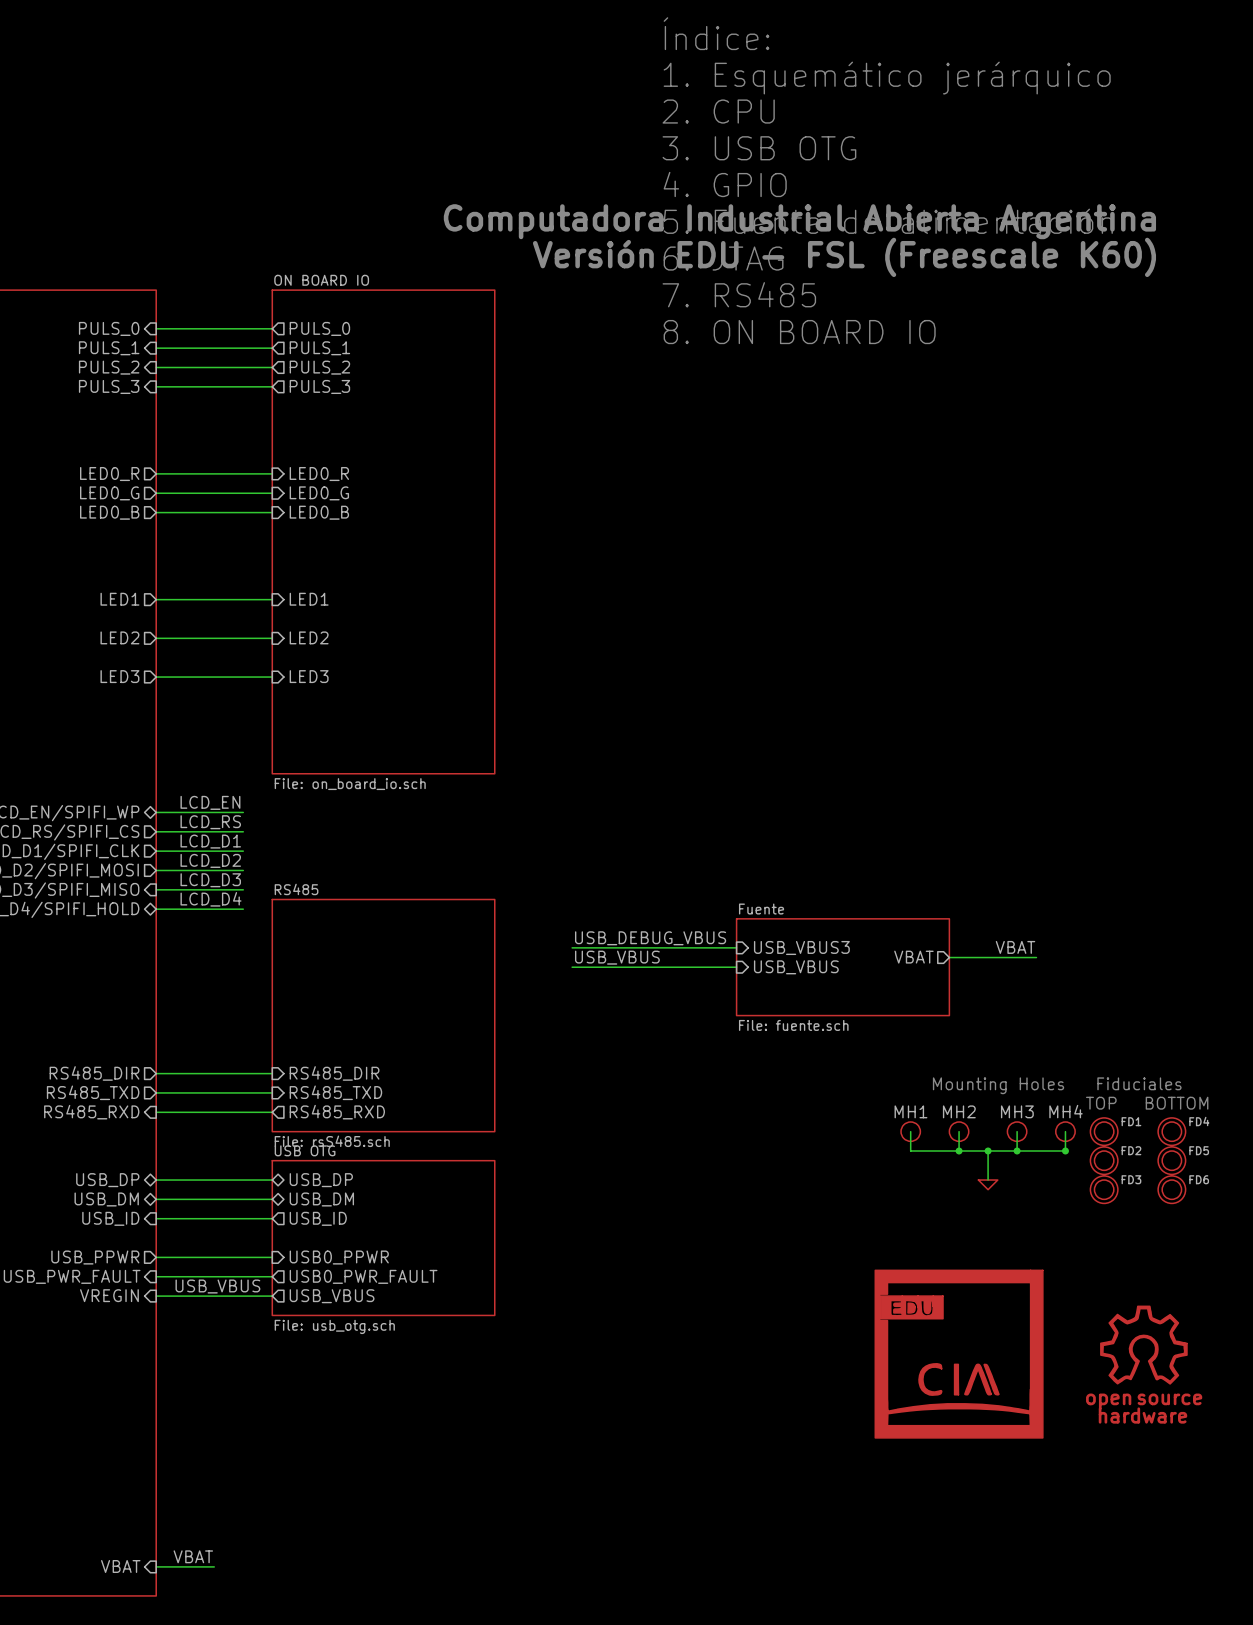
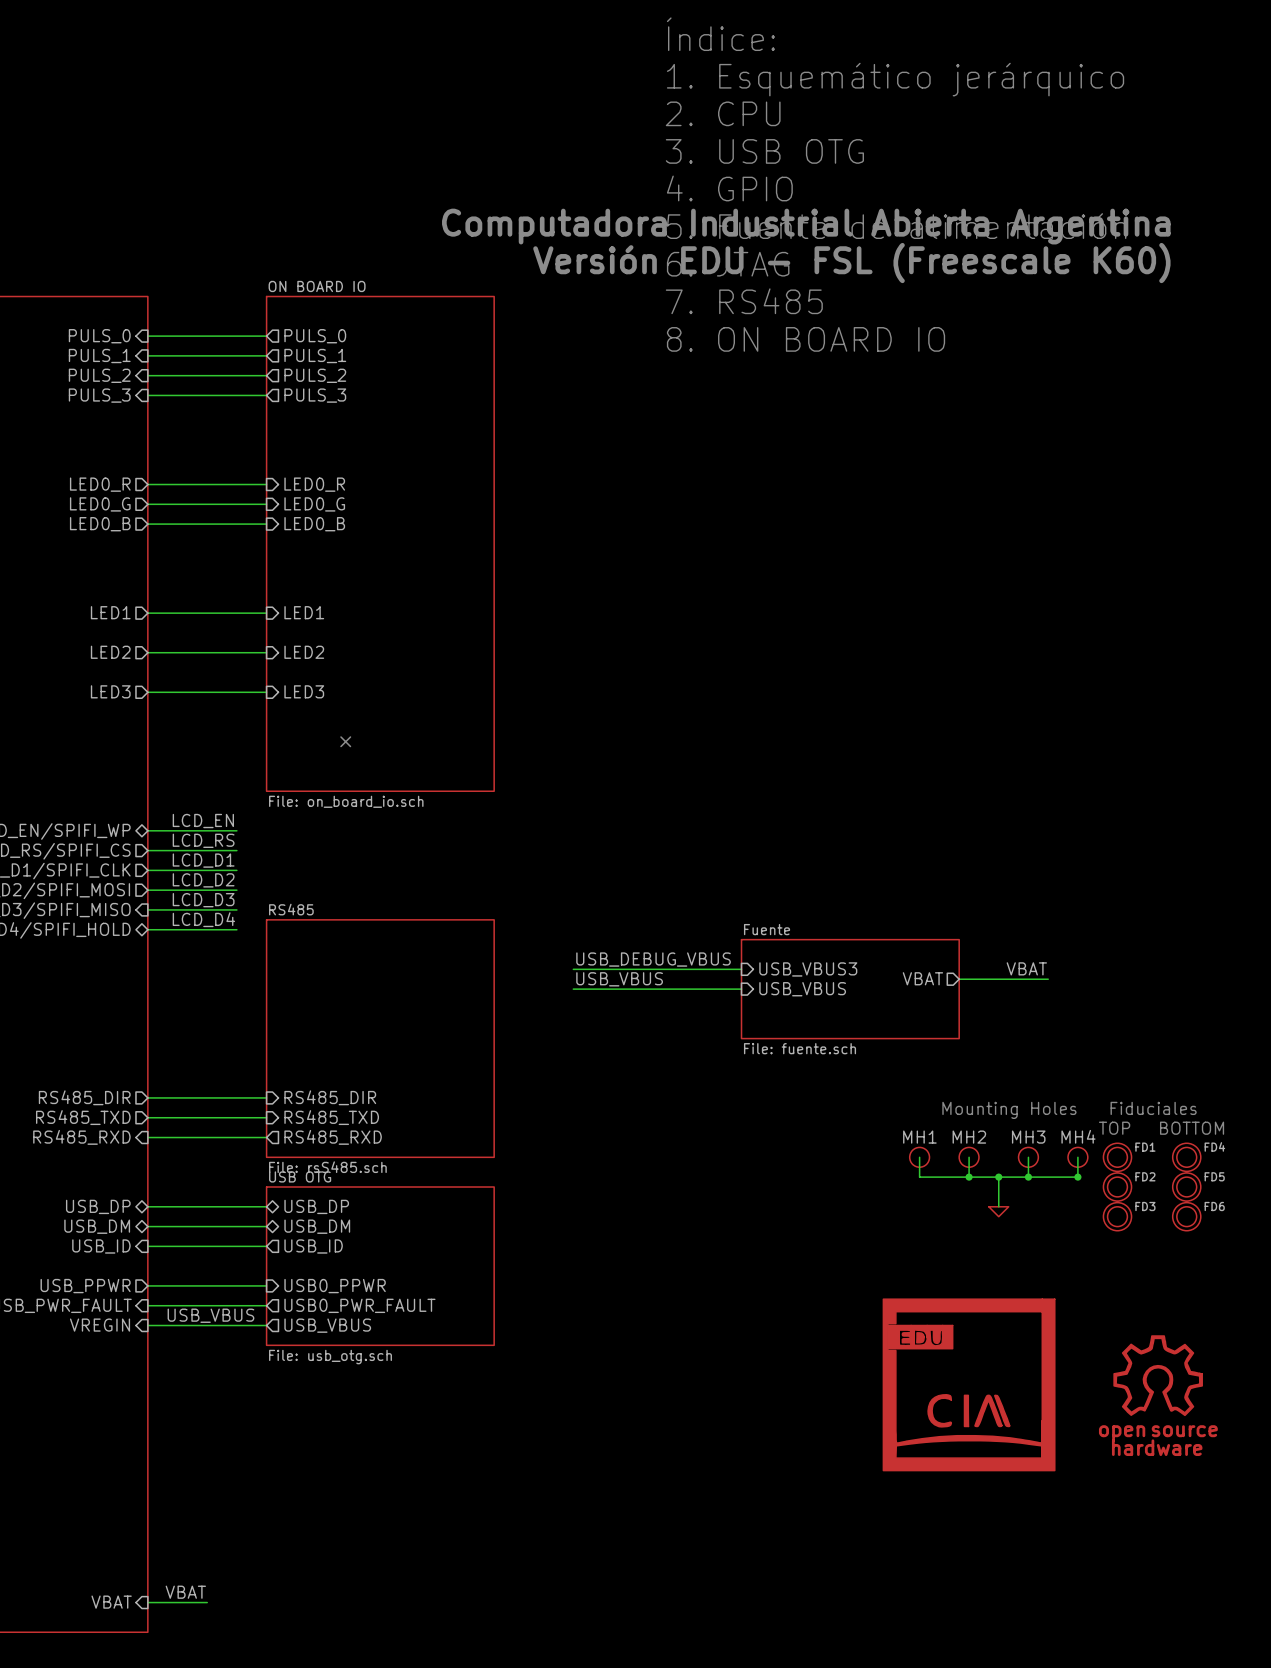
no-connect mark: none -> (345, 741)

